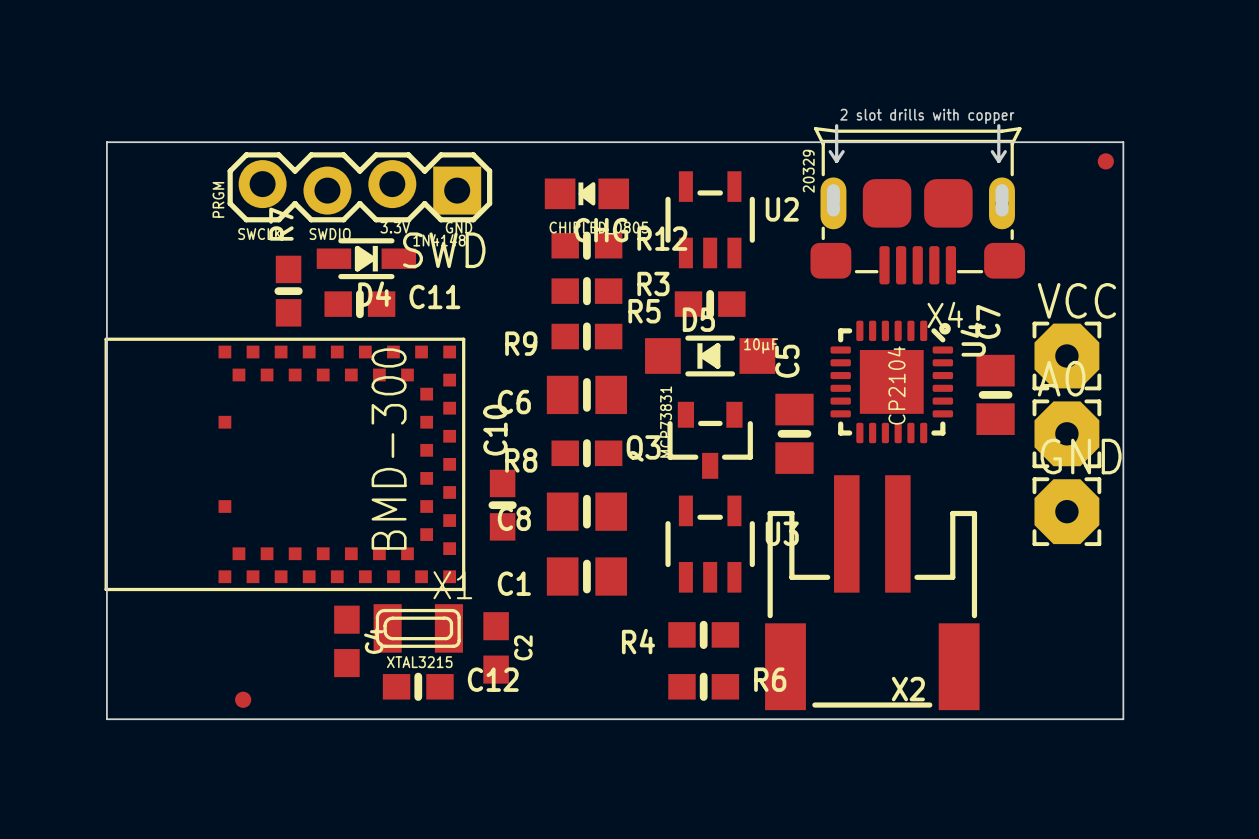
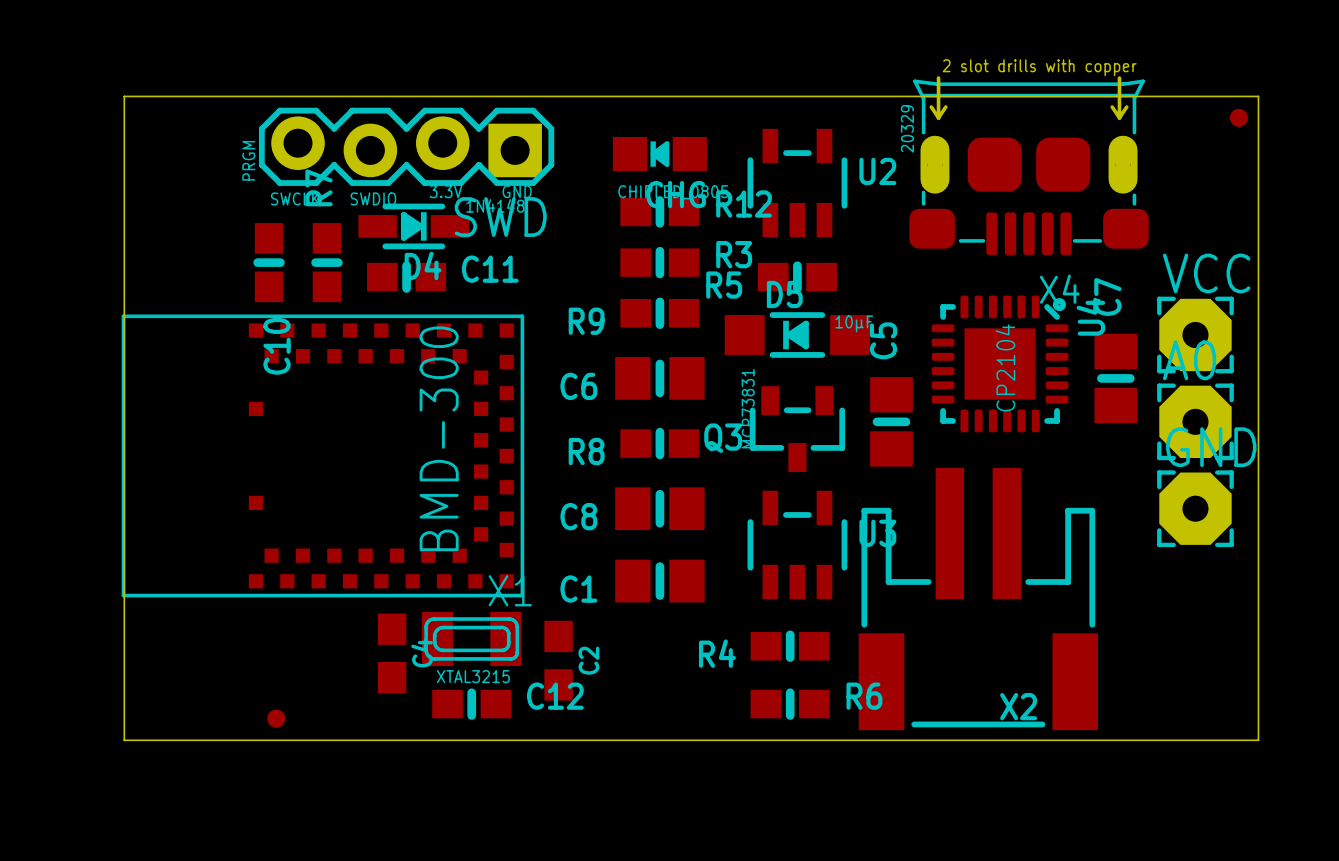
C10 name position: C10 (495, 430) -> C10 (277, 346)
C10 position: (502, 505) -> (269, 262)

